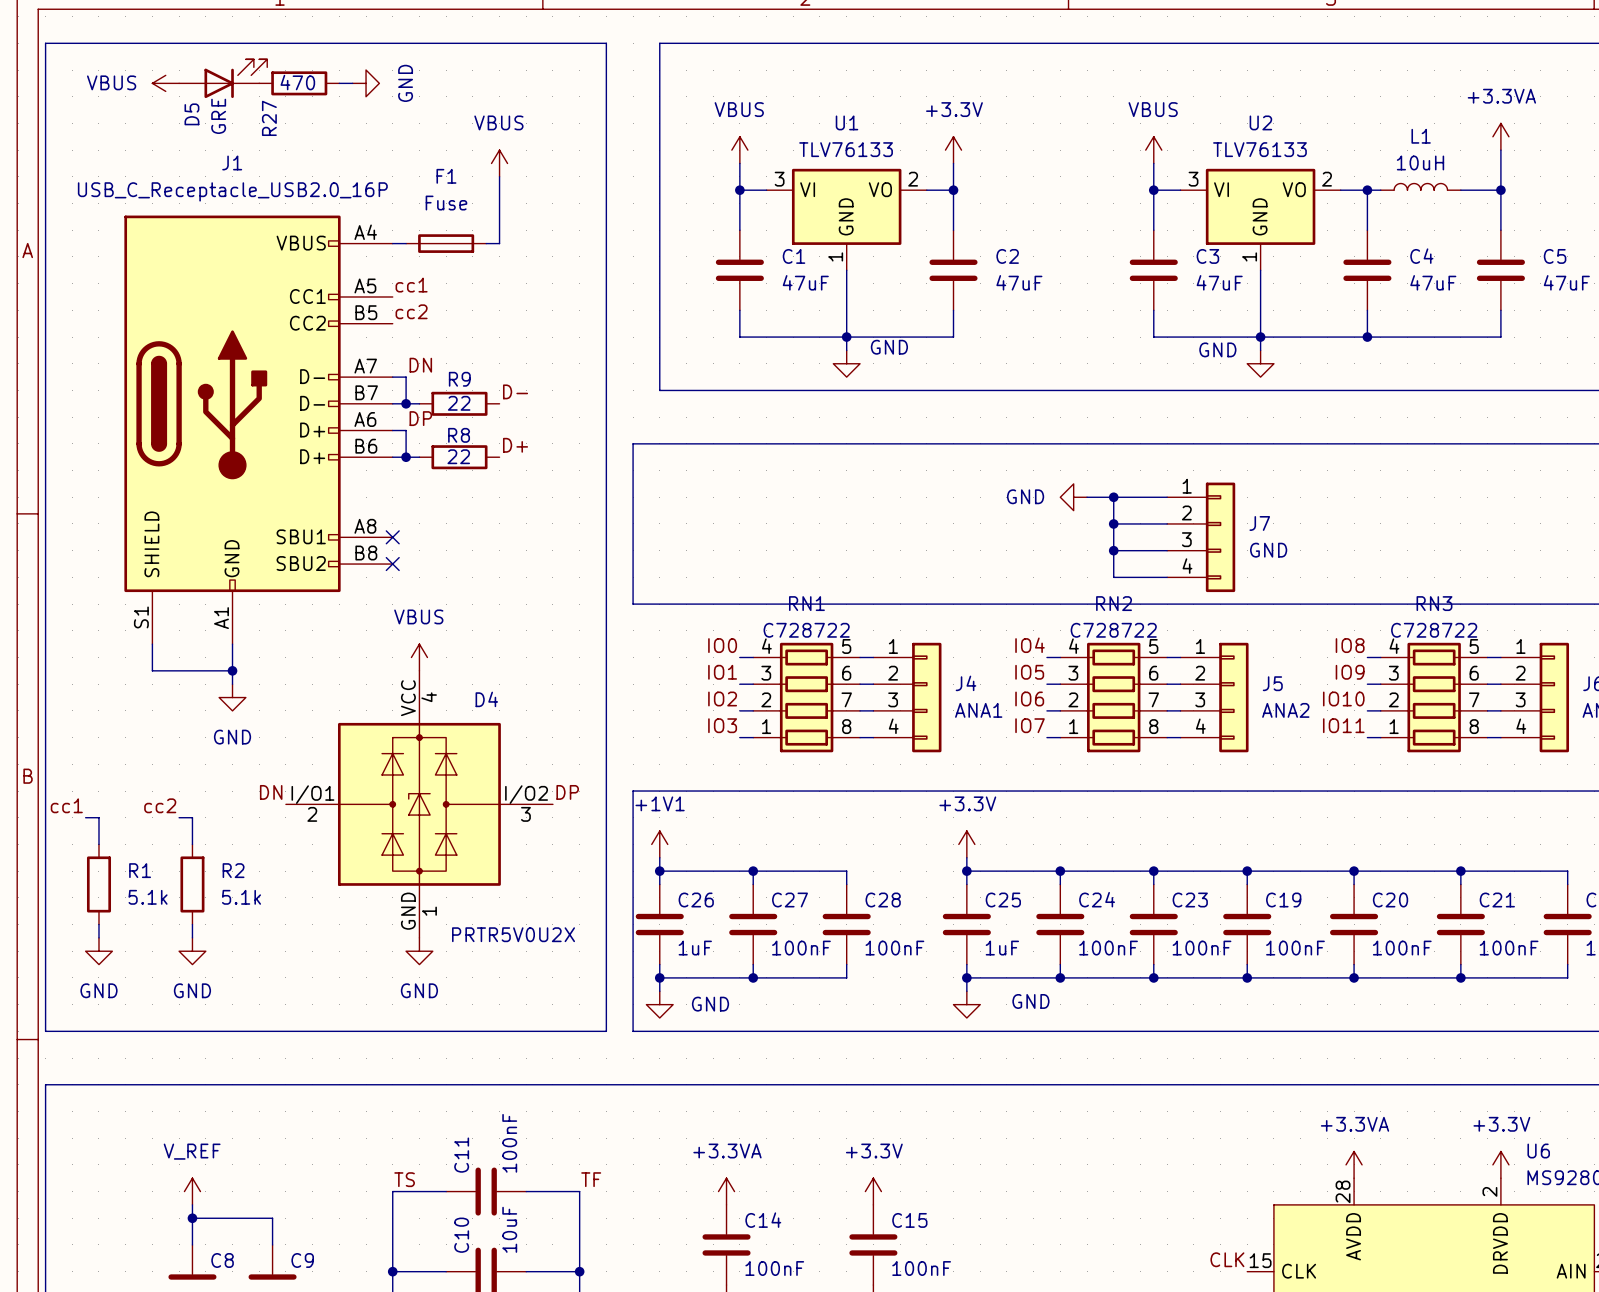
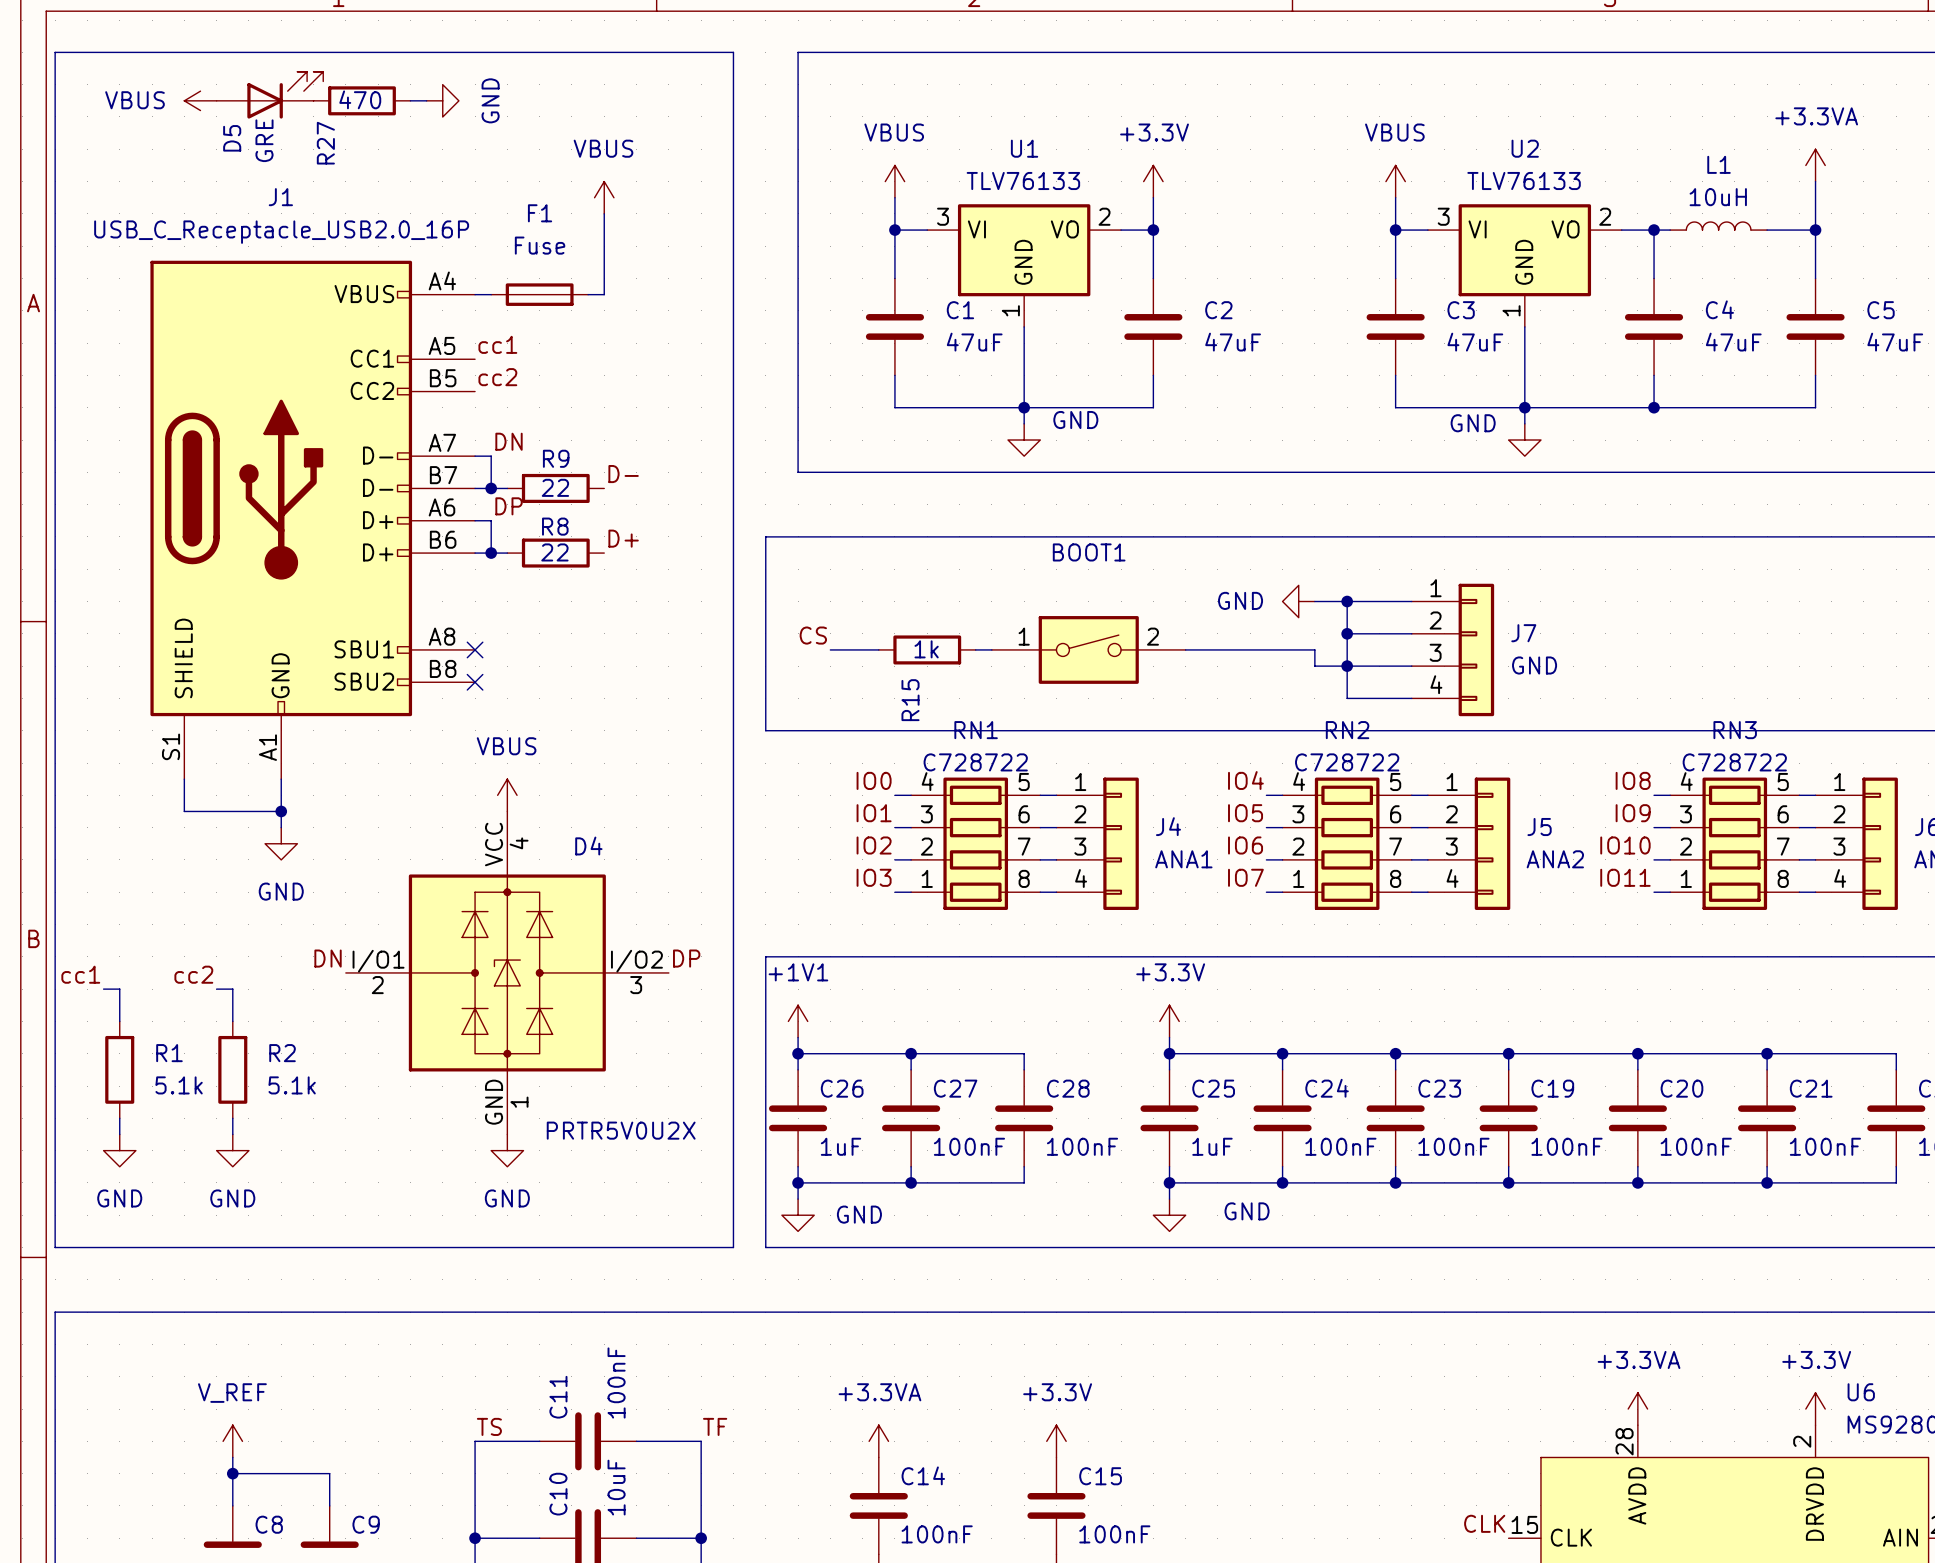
label: none -> CS (813, 635)
wire: none -> (830, 649) (878, 649)
R15: none -> 1k (927, 649)
wire: none -> (975, 649) (991, 649)
BOOT1: none -> (1088, 649)
wire: none -> (1185, 649) (1314, 649) (1314, 666) (1347, 666)

